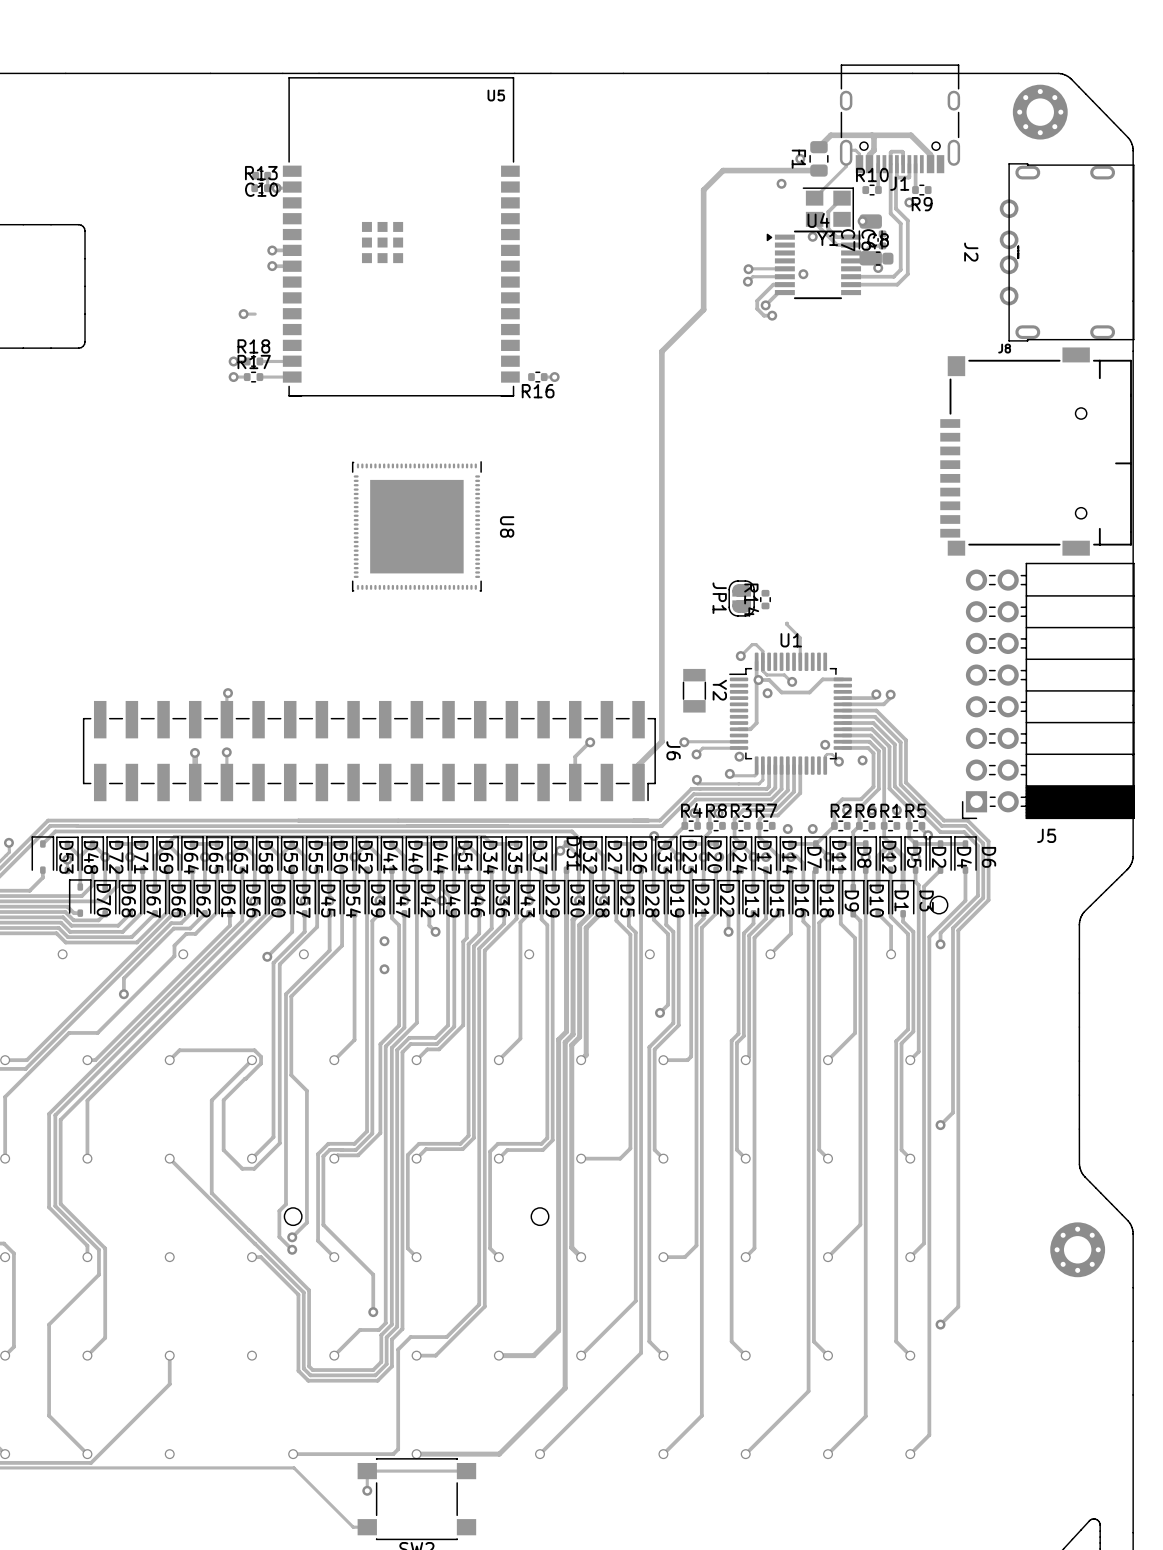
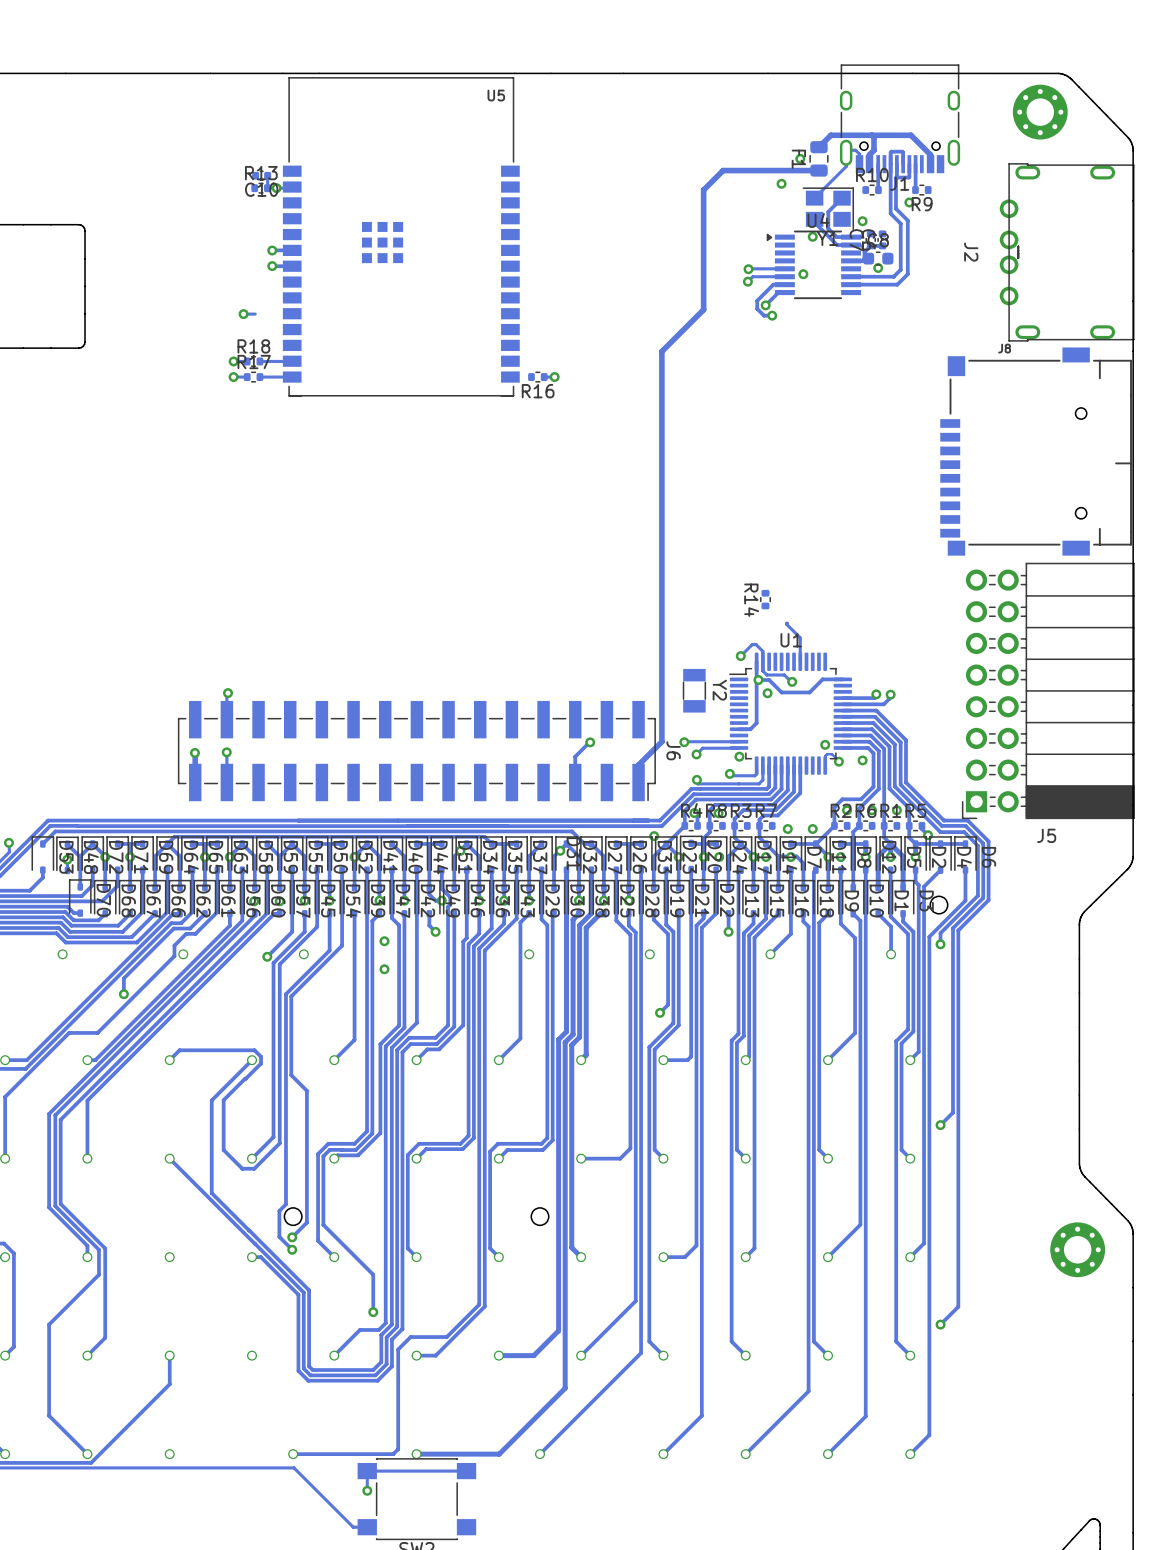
C7 footprint: [858, 214, 883, 266] -> [865, 230, 876, 250]
U8: (416, 526) -> none
JP1: (741, 598) -> none
J6 footprint: [82, 700, 656, 802] -> [177, 700, 656, 802]

